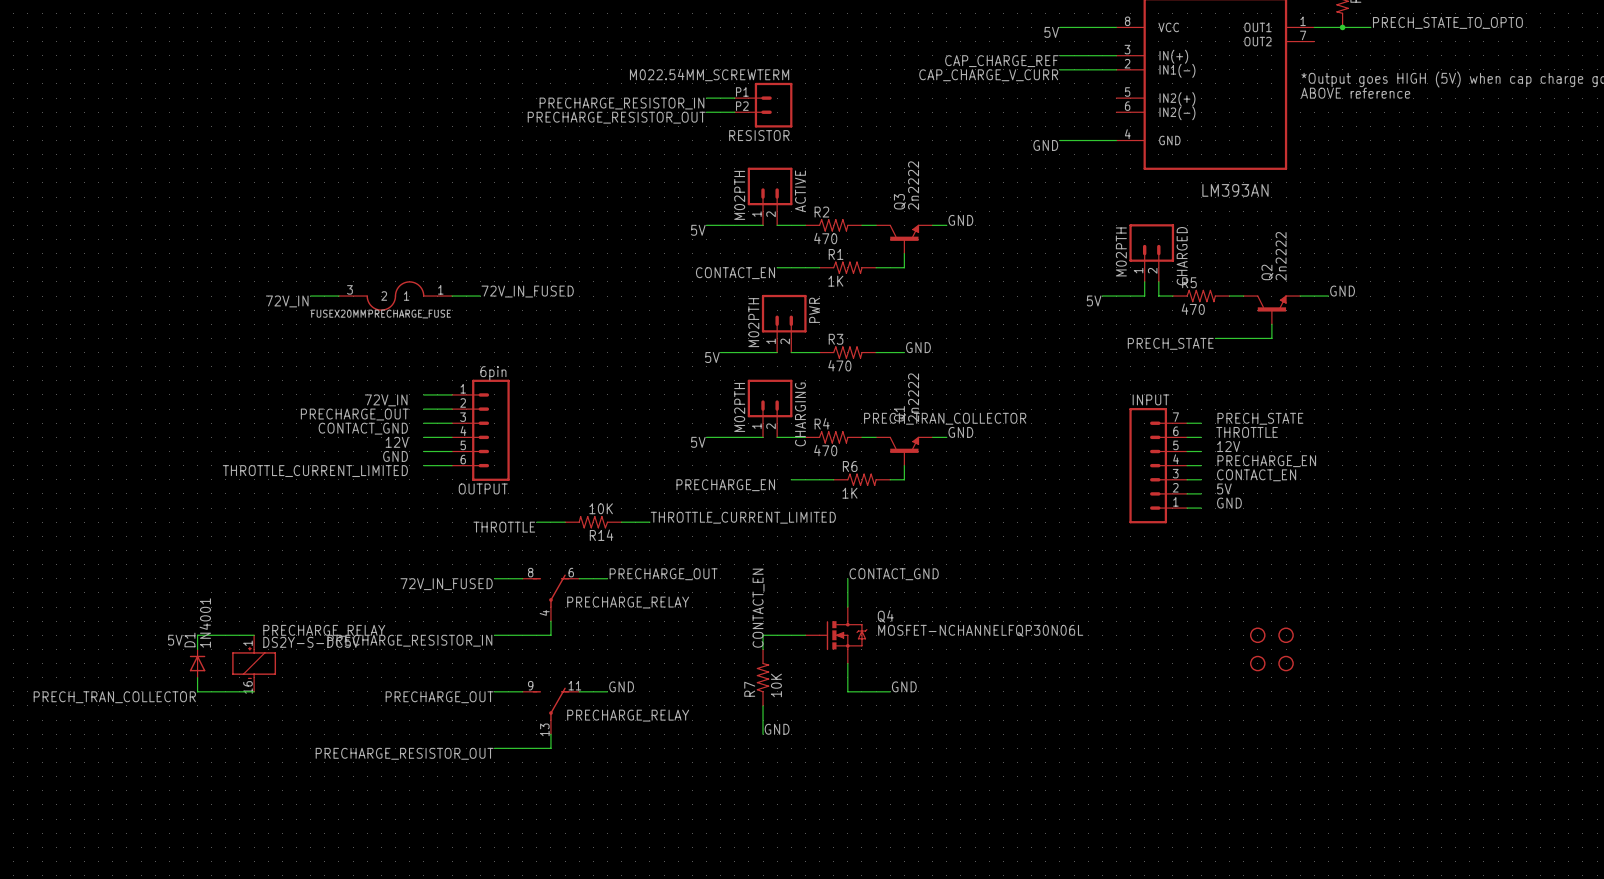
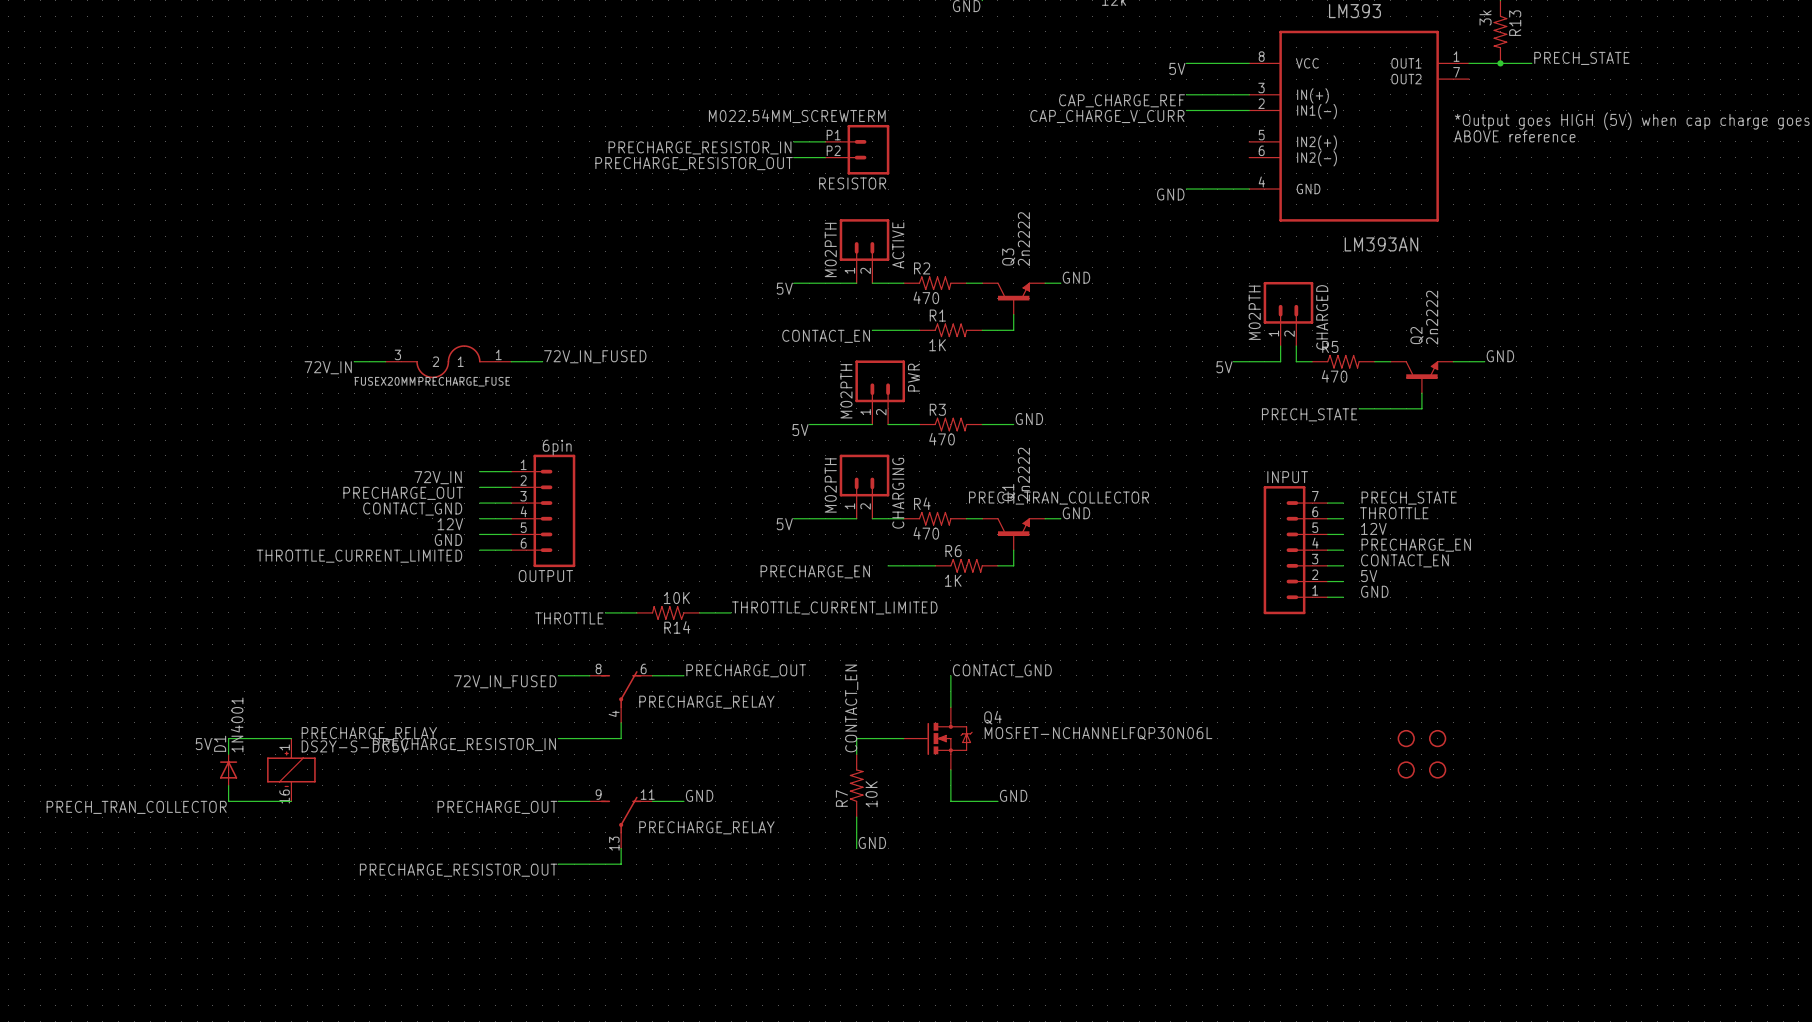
label: PRECH_STATE_TO_OPTO (1447, 22) -> PRECH_STATE (1581, 58)

